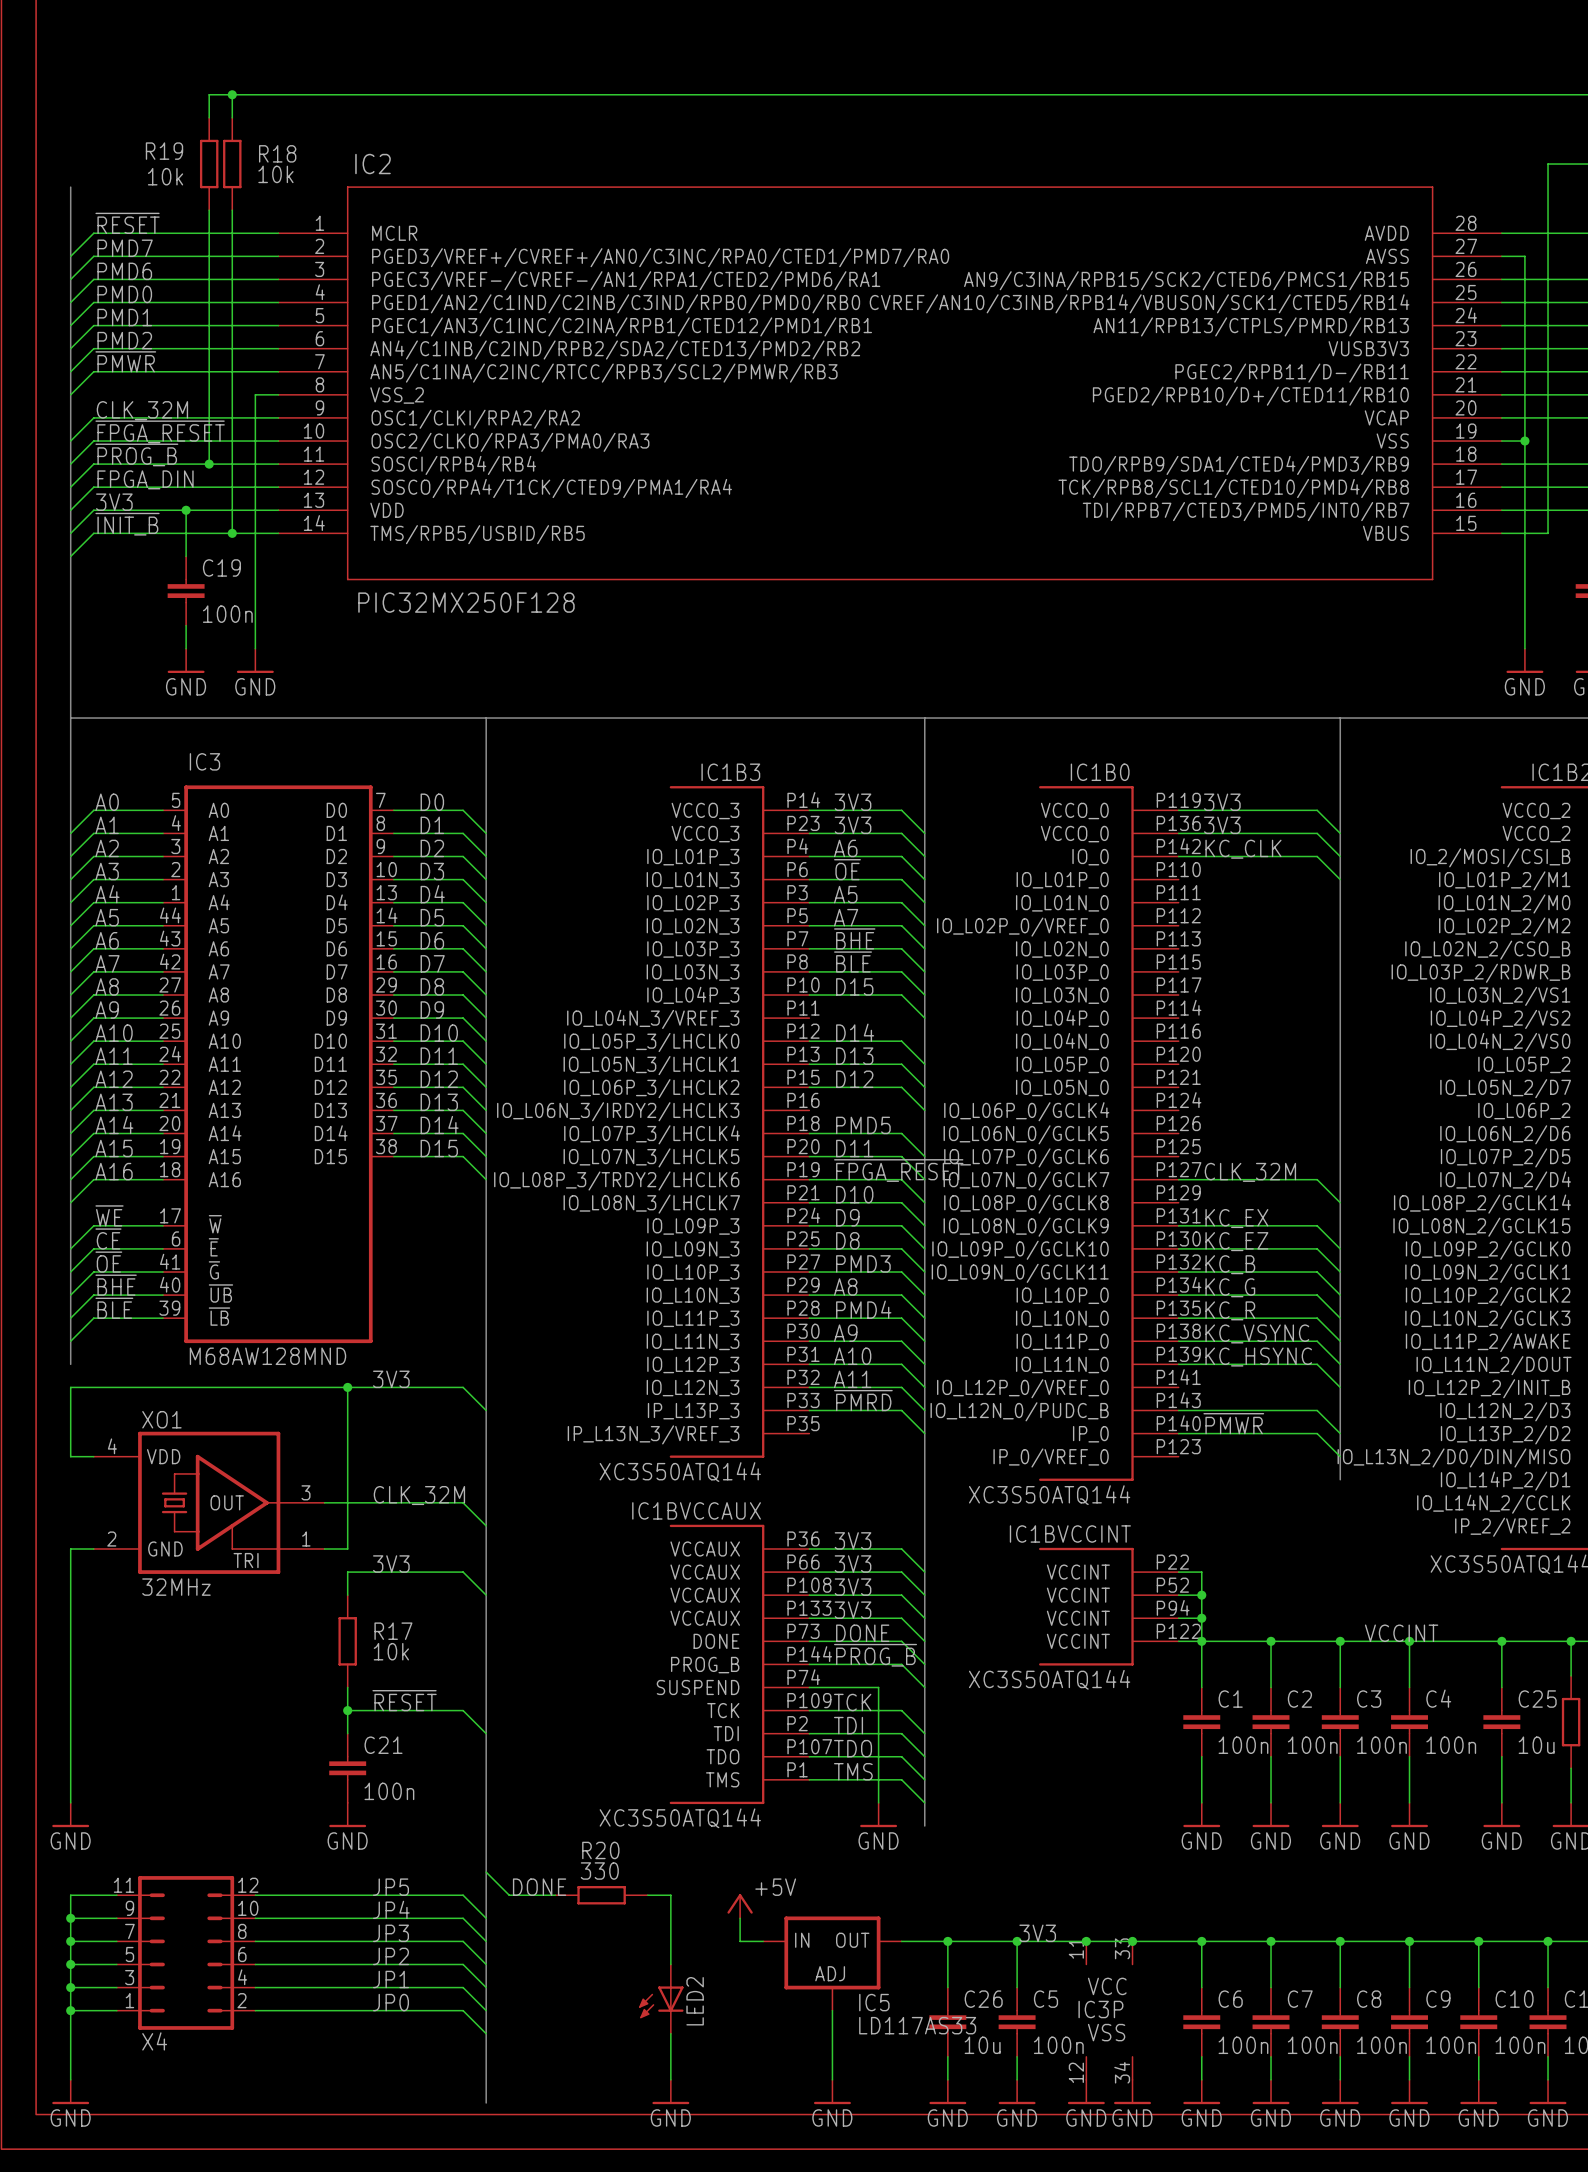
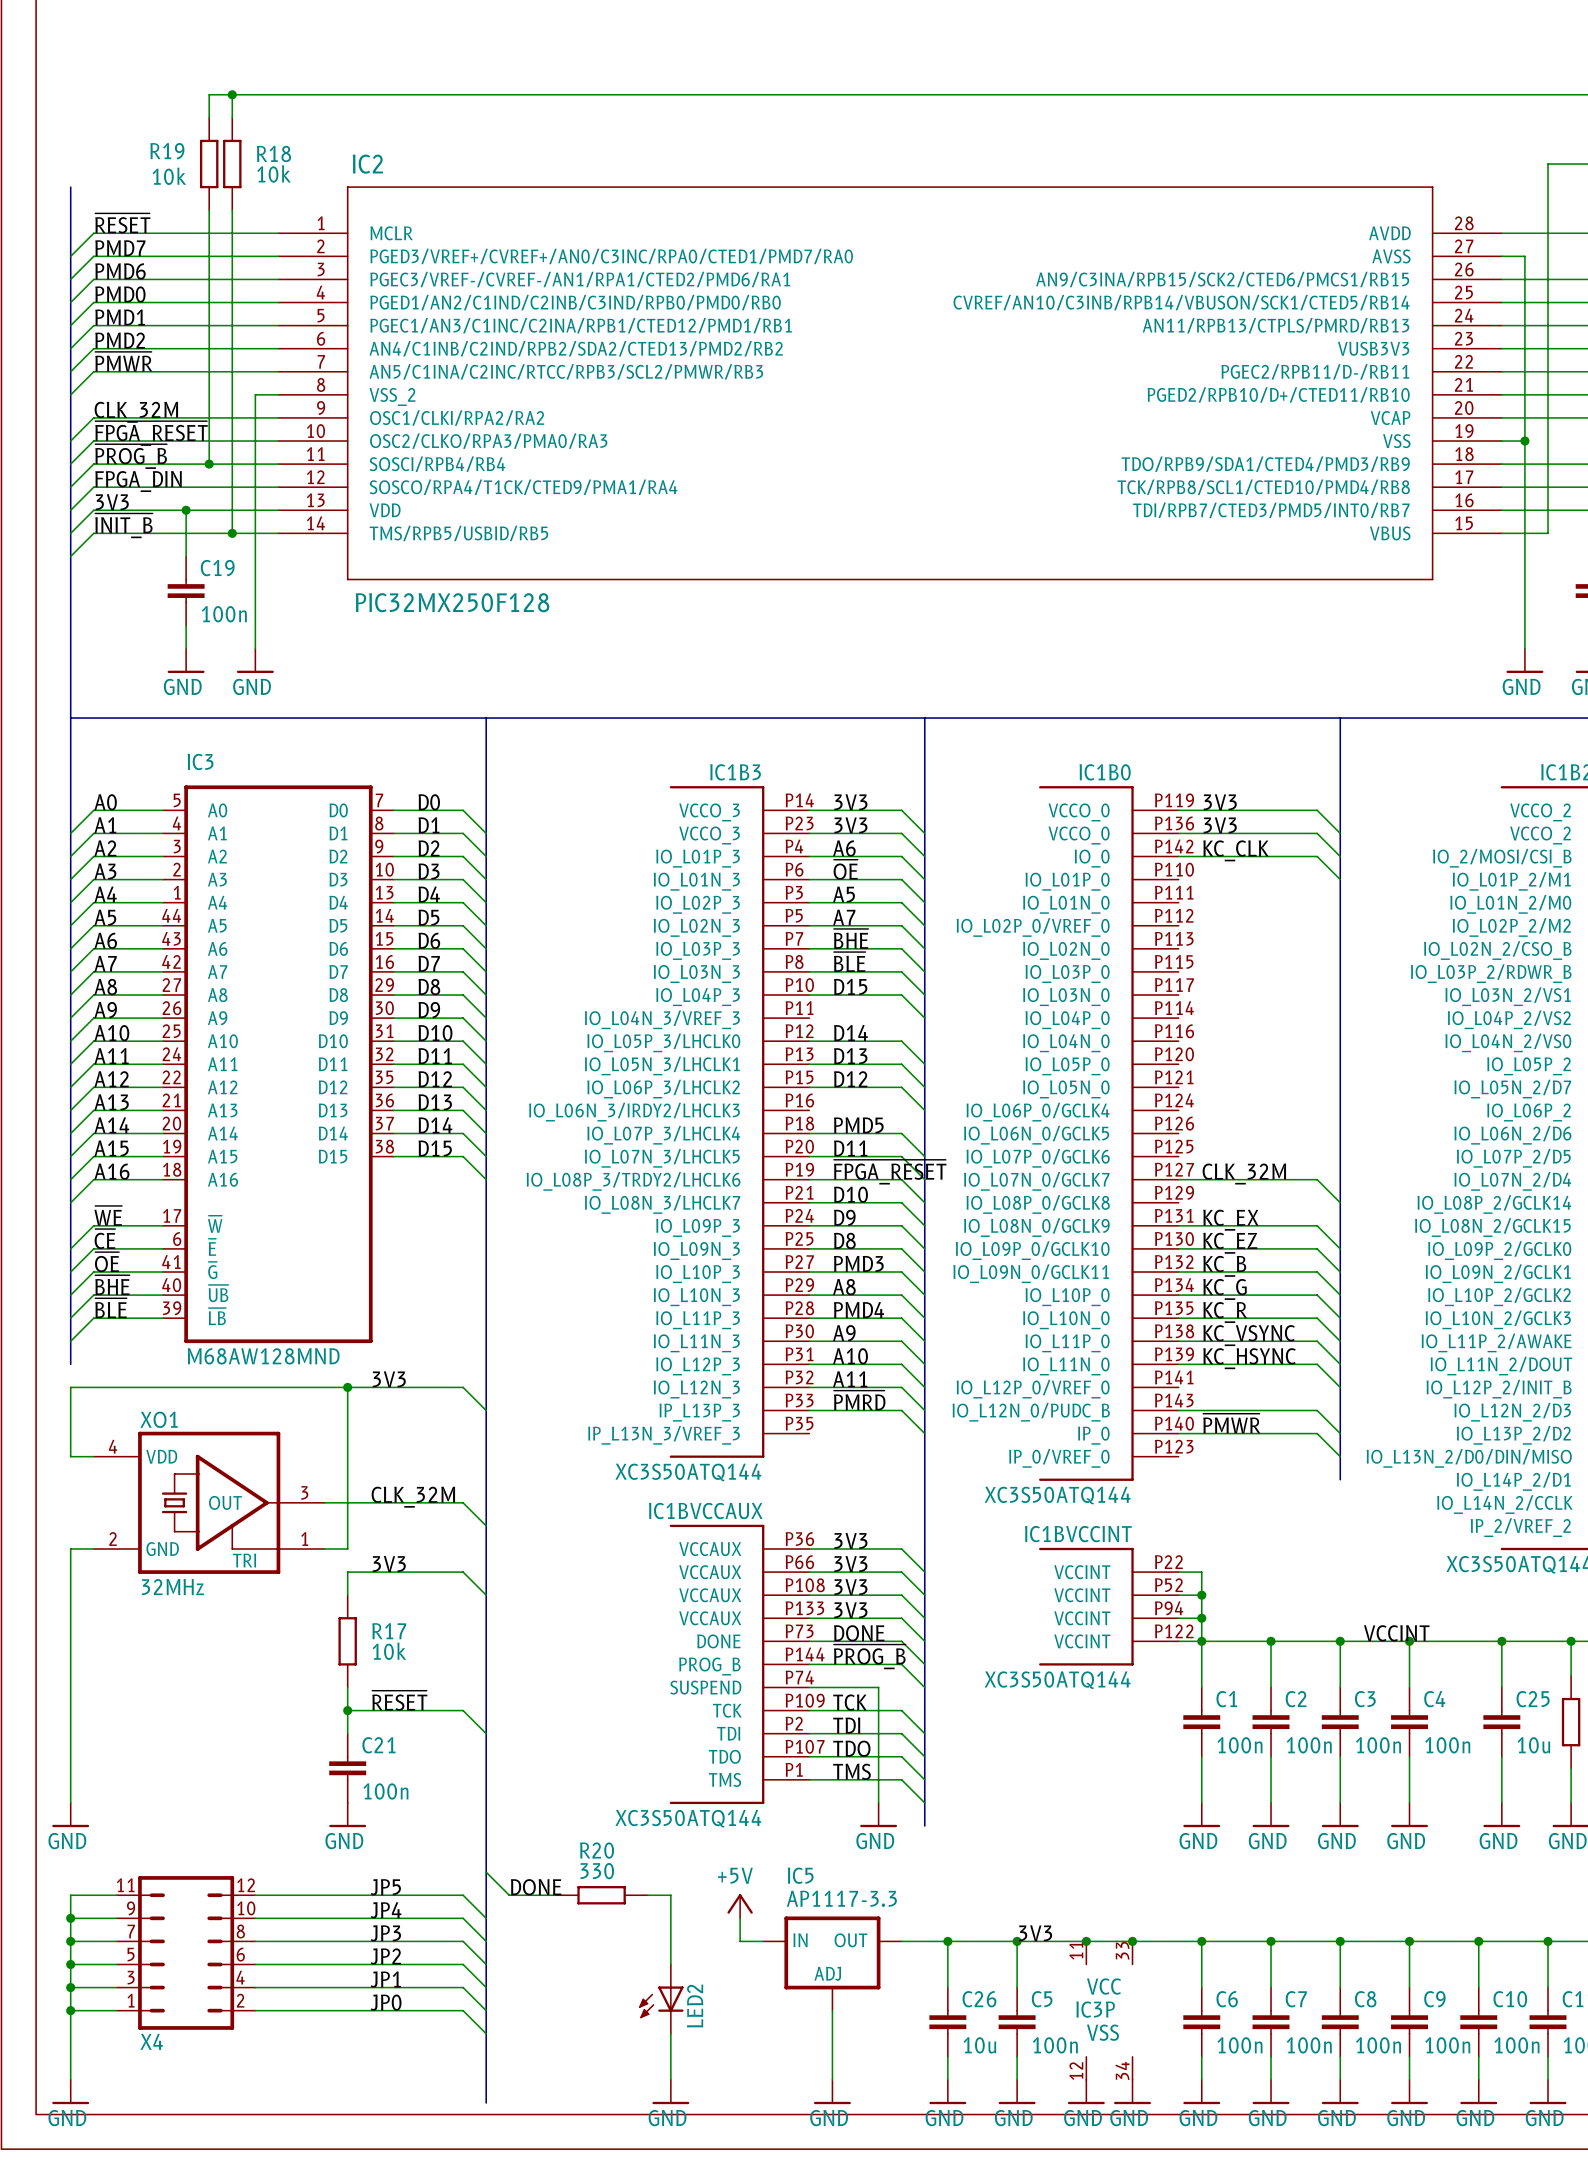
power symbol text position: +5V (775, 1887) -> +5V (735, 1875)
IC5 name position: IC5 (874, 2002) -> IC5 (800, 1875)
IC5 value: LD117AS33 (917, 2025) -> AP1117-3.3 (841, 1898)

